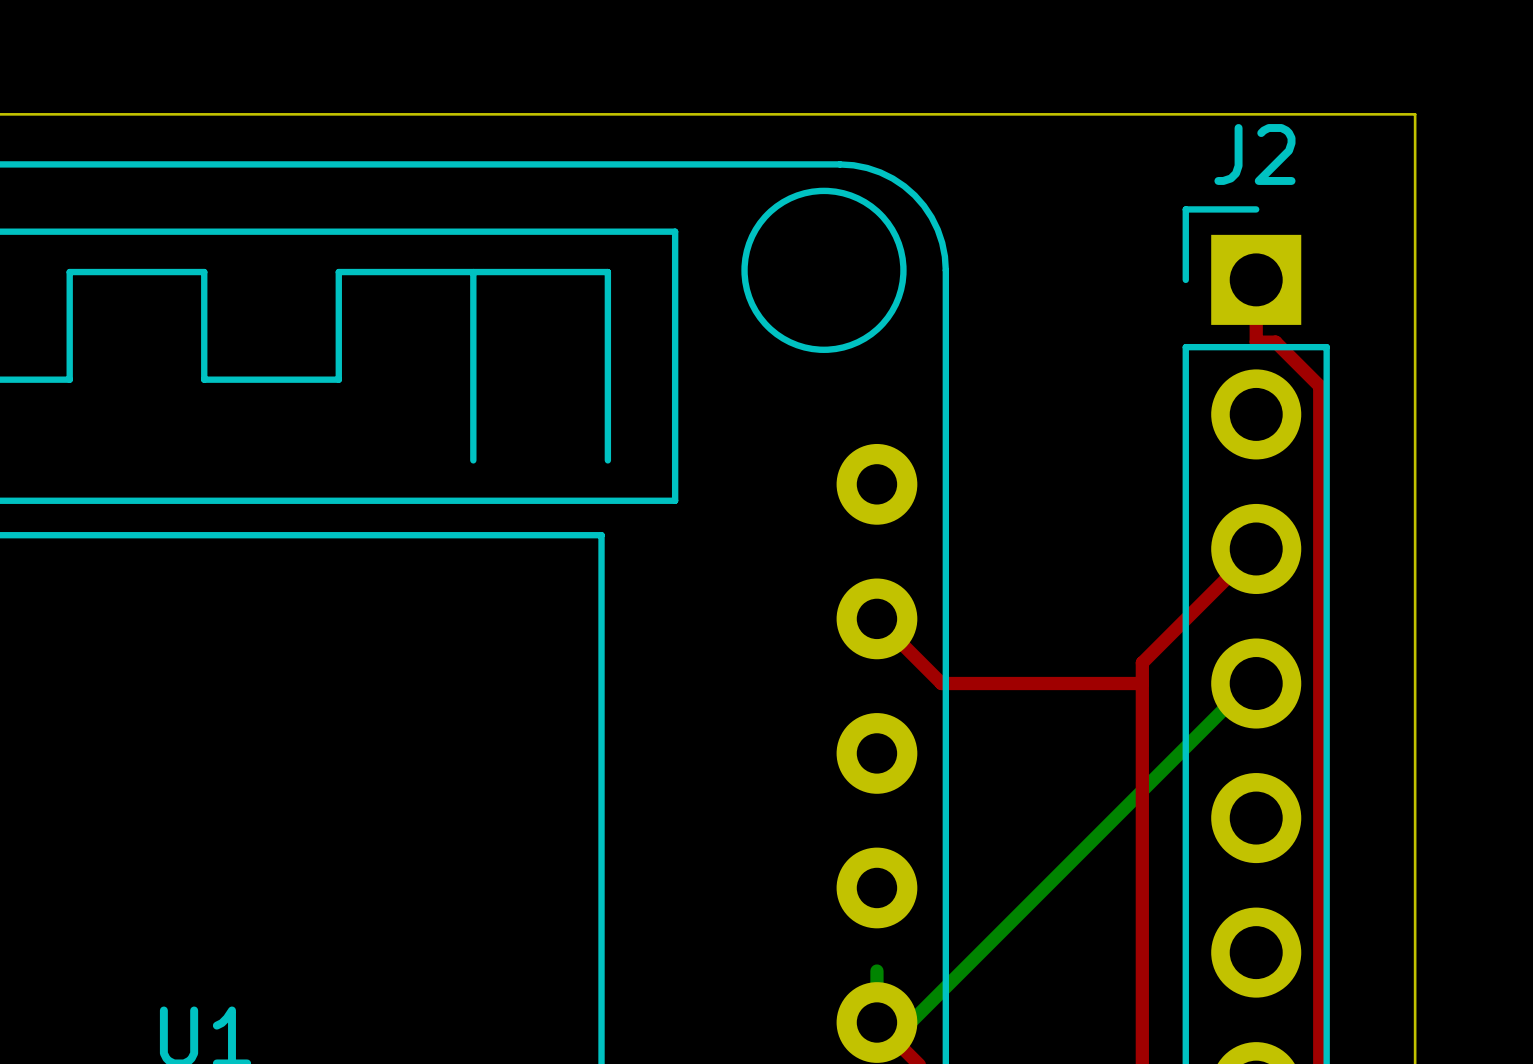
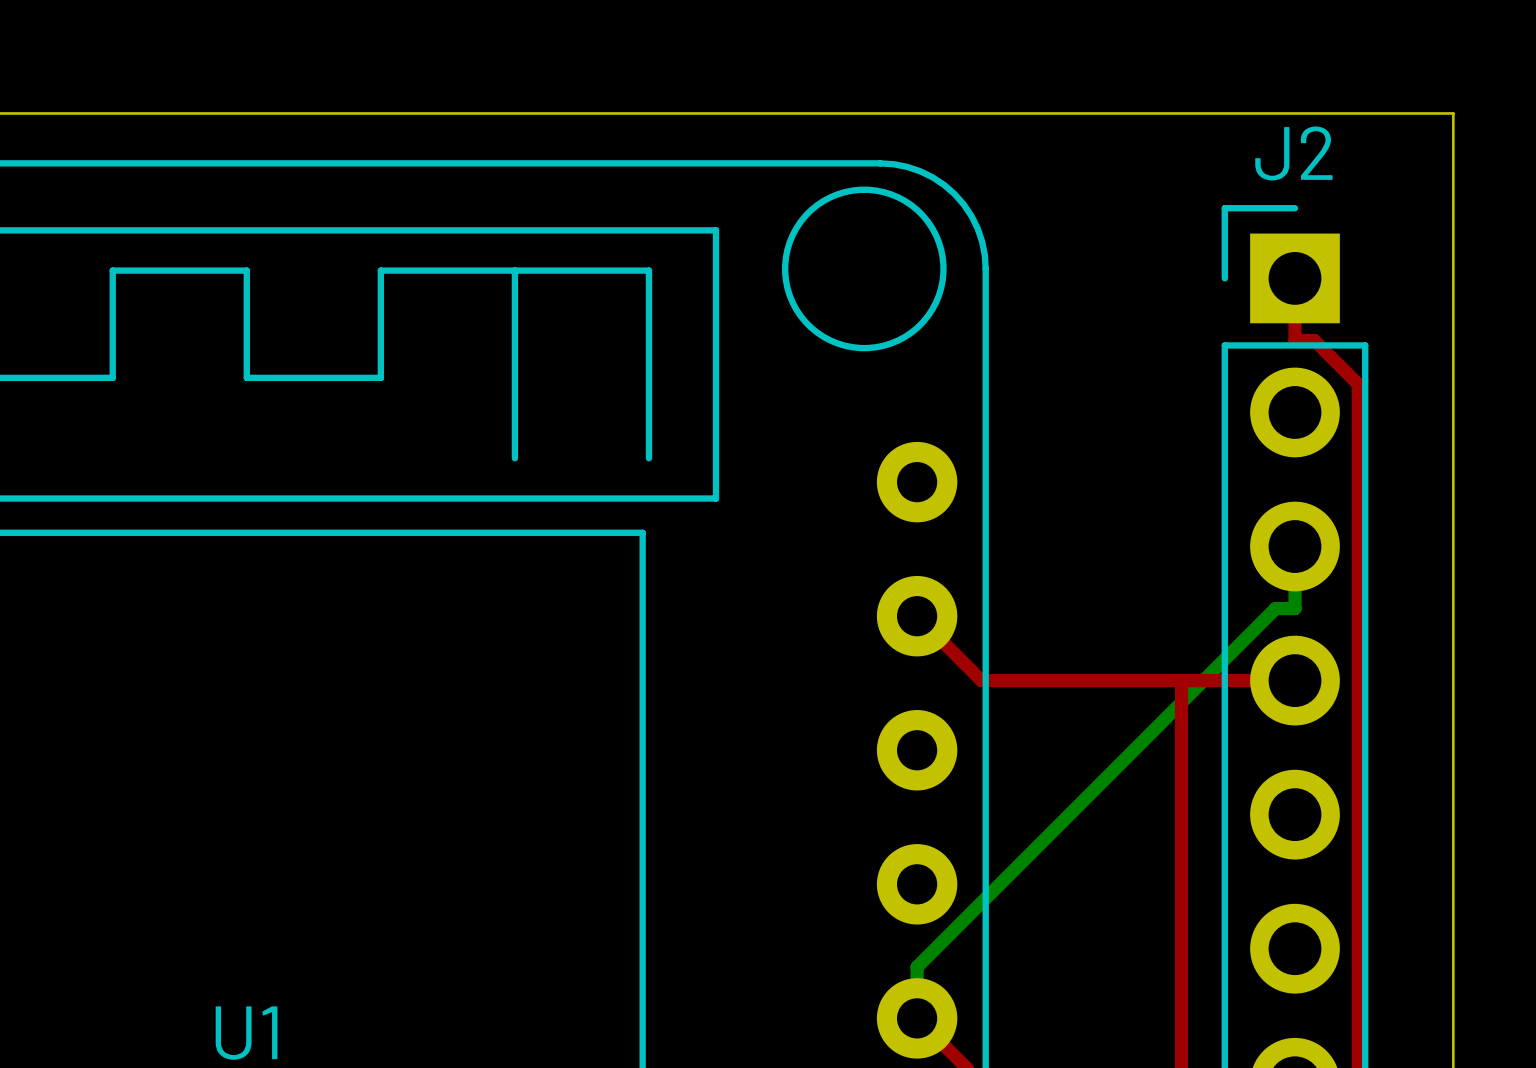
top track: (1256, 548) (1142, 662) (1142, 683) -> (1295, 680) (1181, 680)
bottom track: none -> (1295, 546) (1295, 608) (1275, 608) (917, 967)
bottom track: (1246, 686) (887, 1045) -> none

